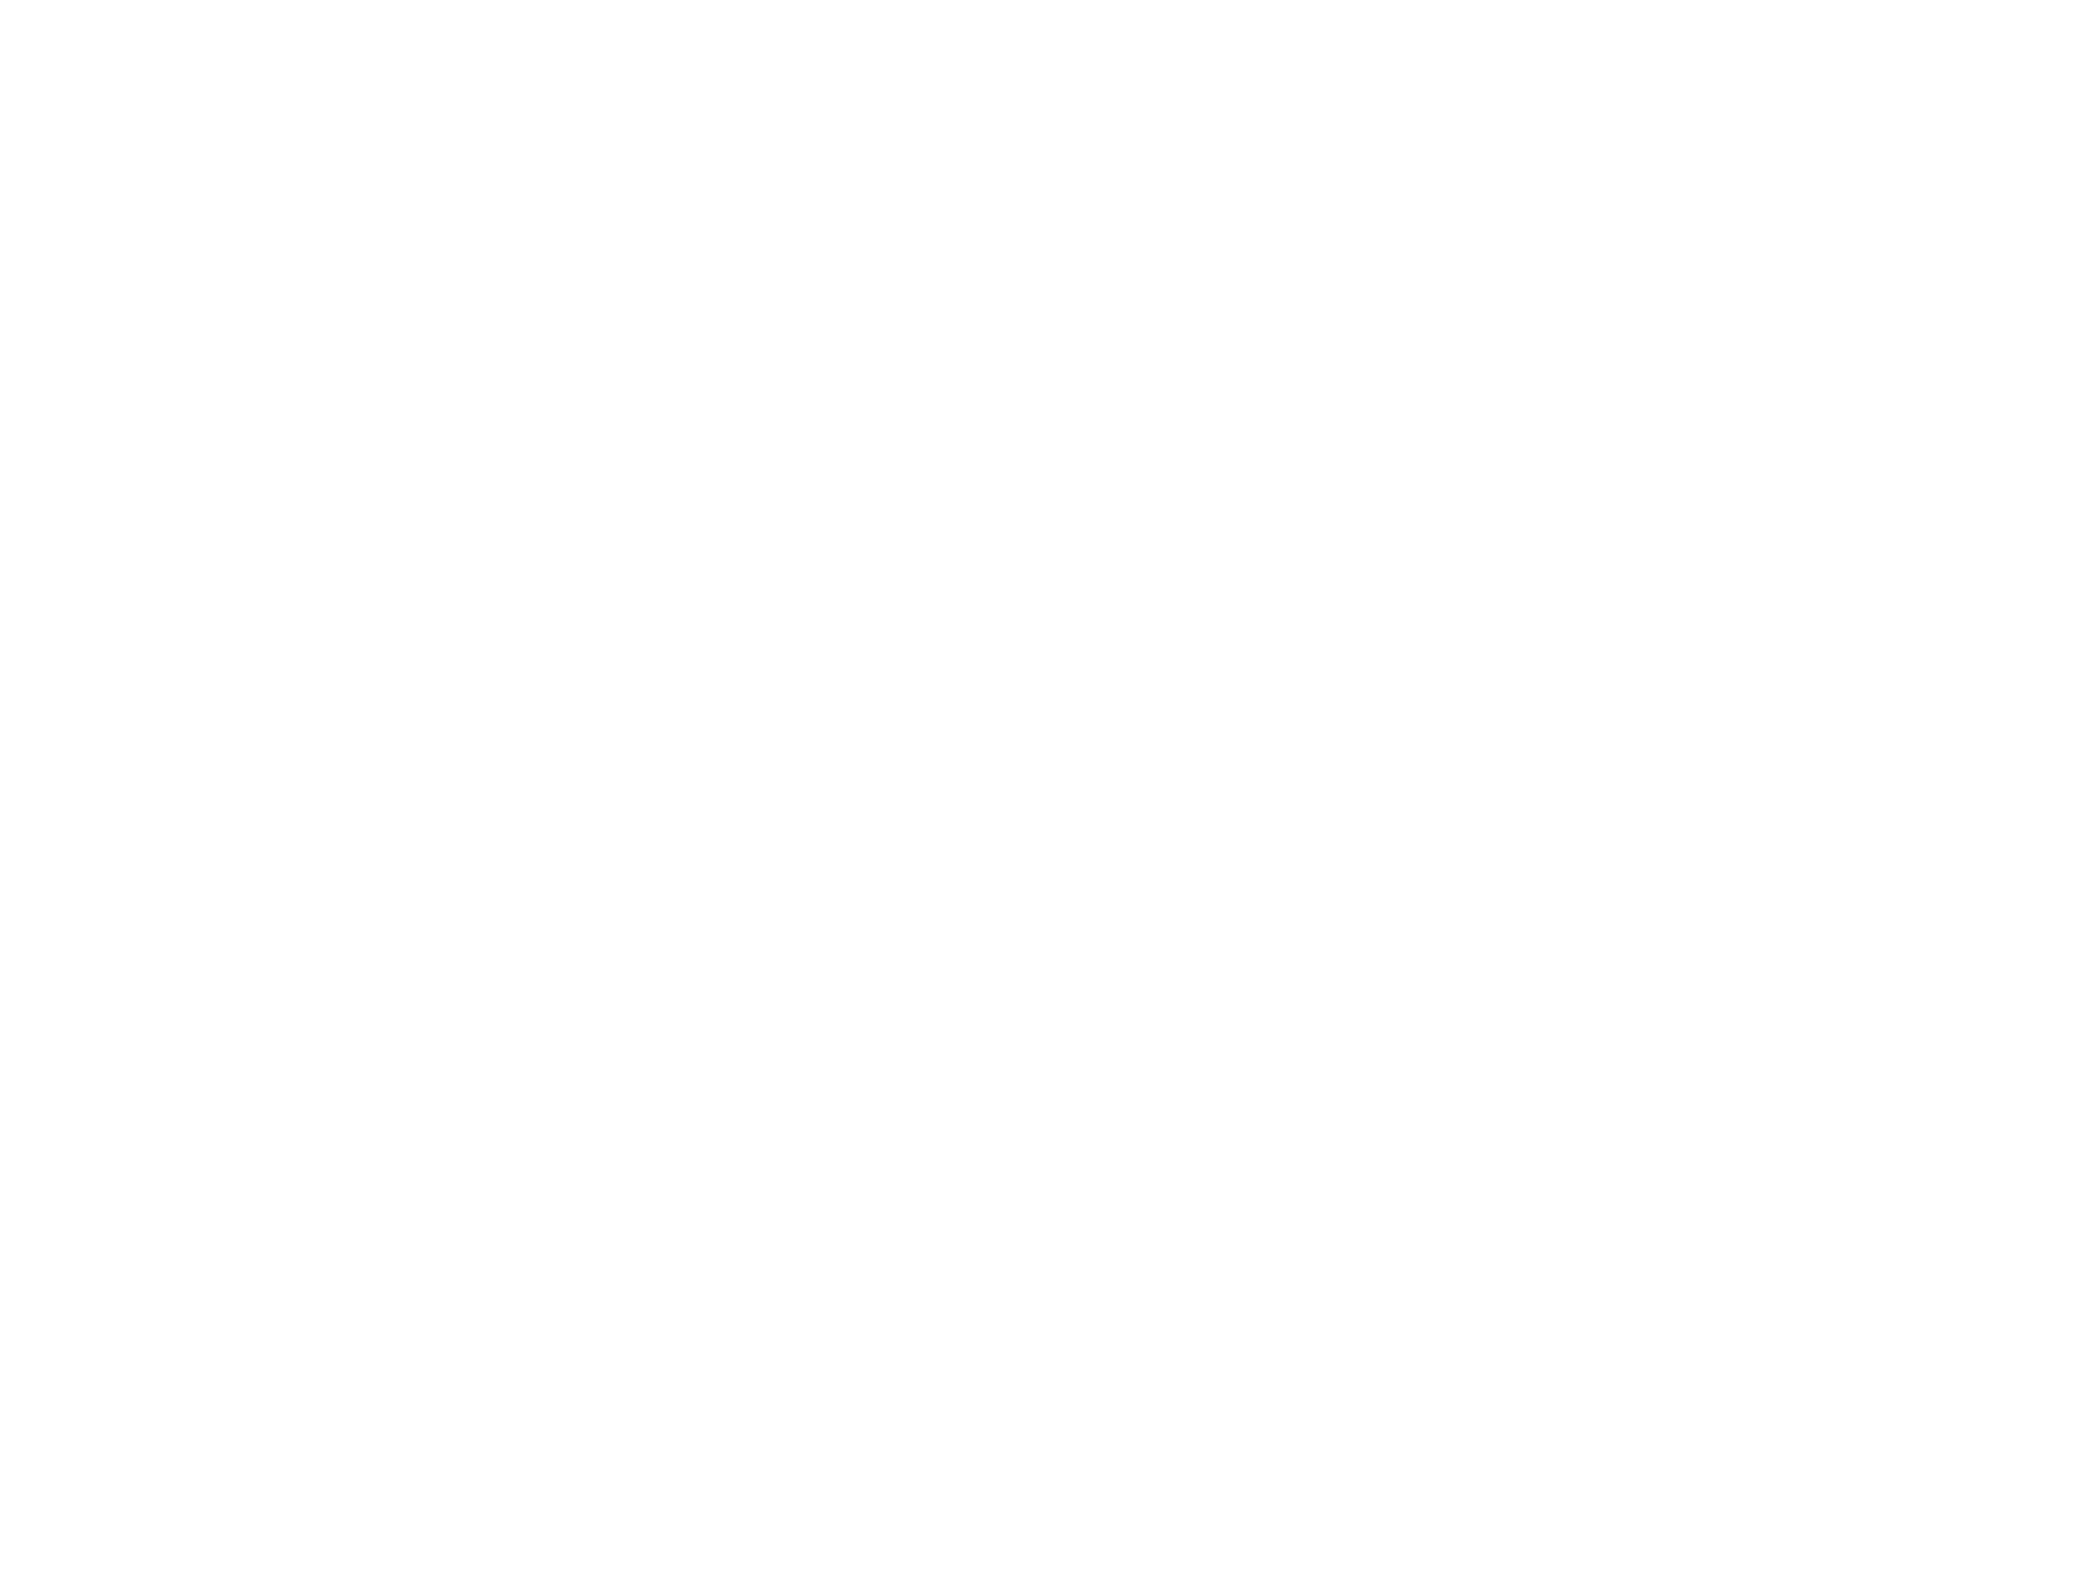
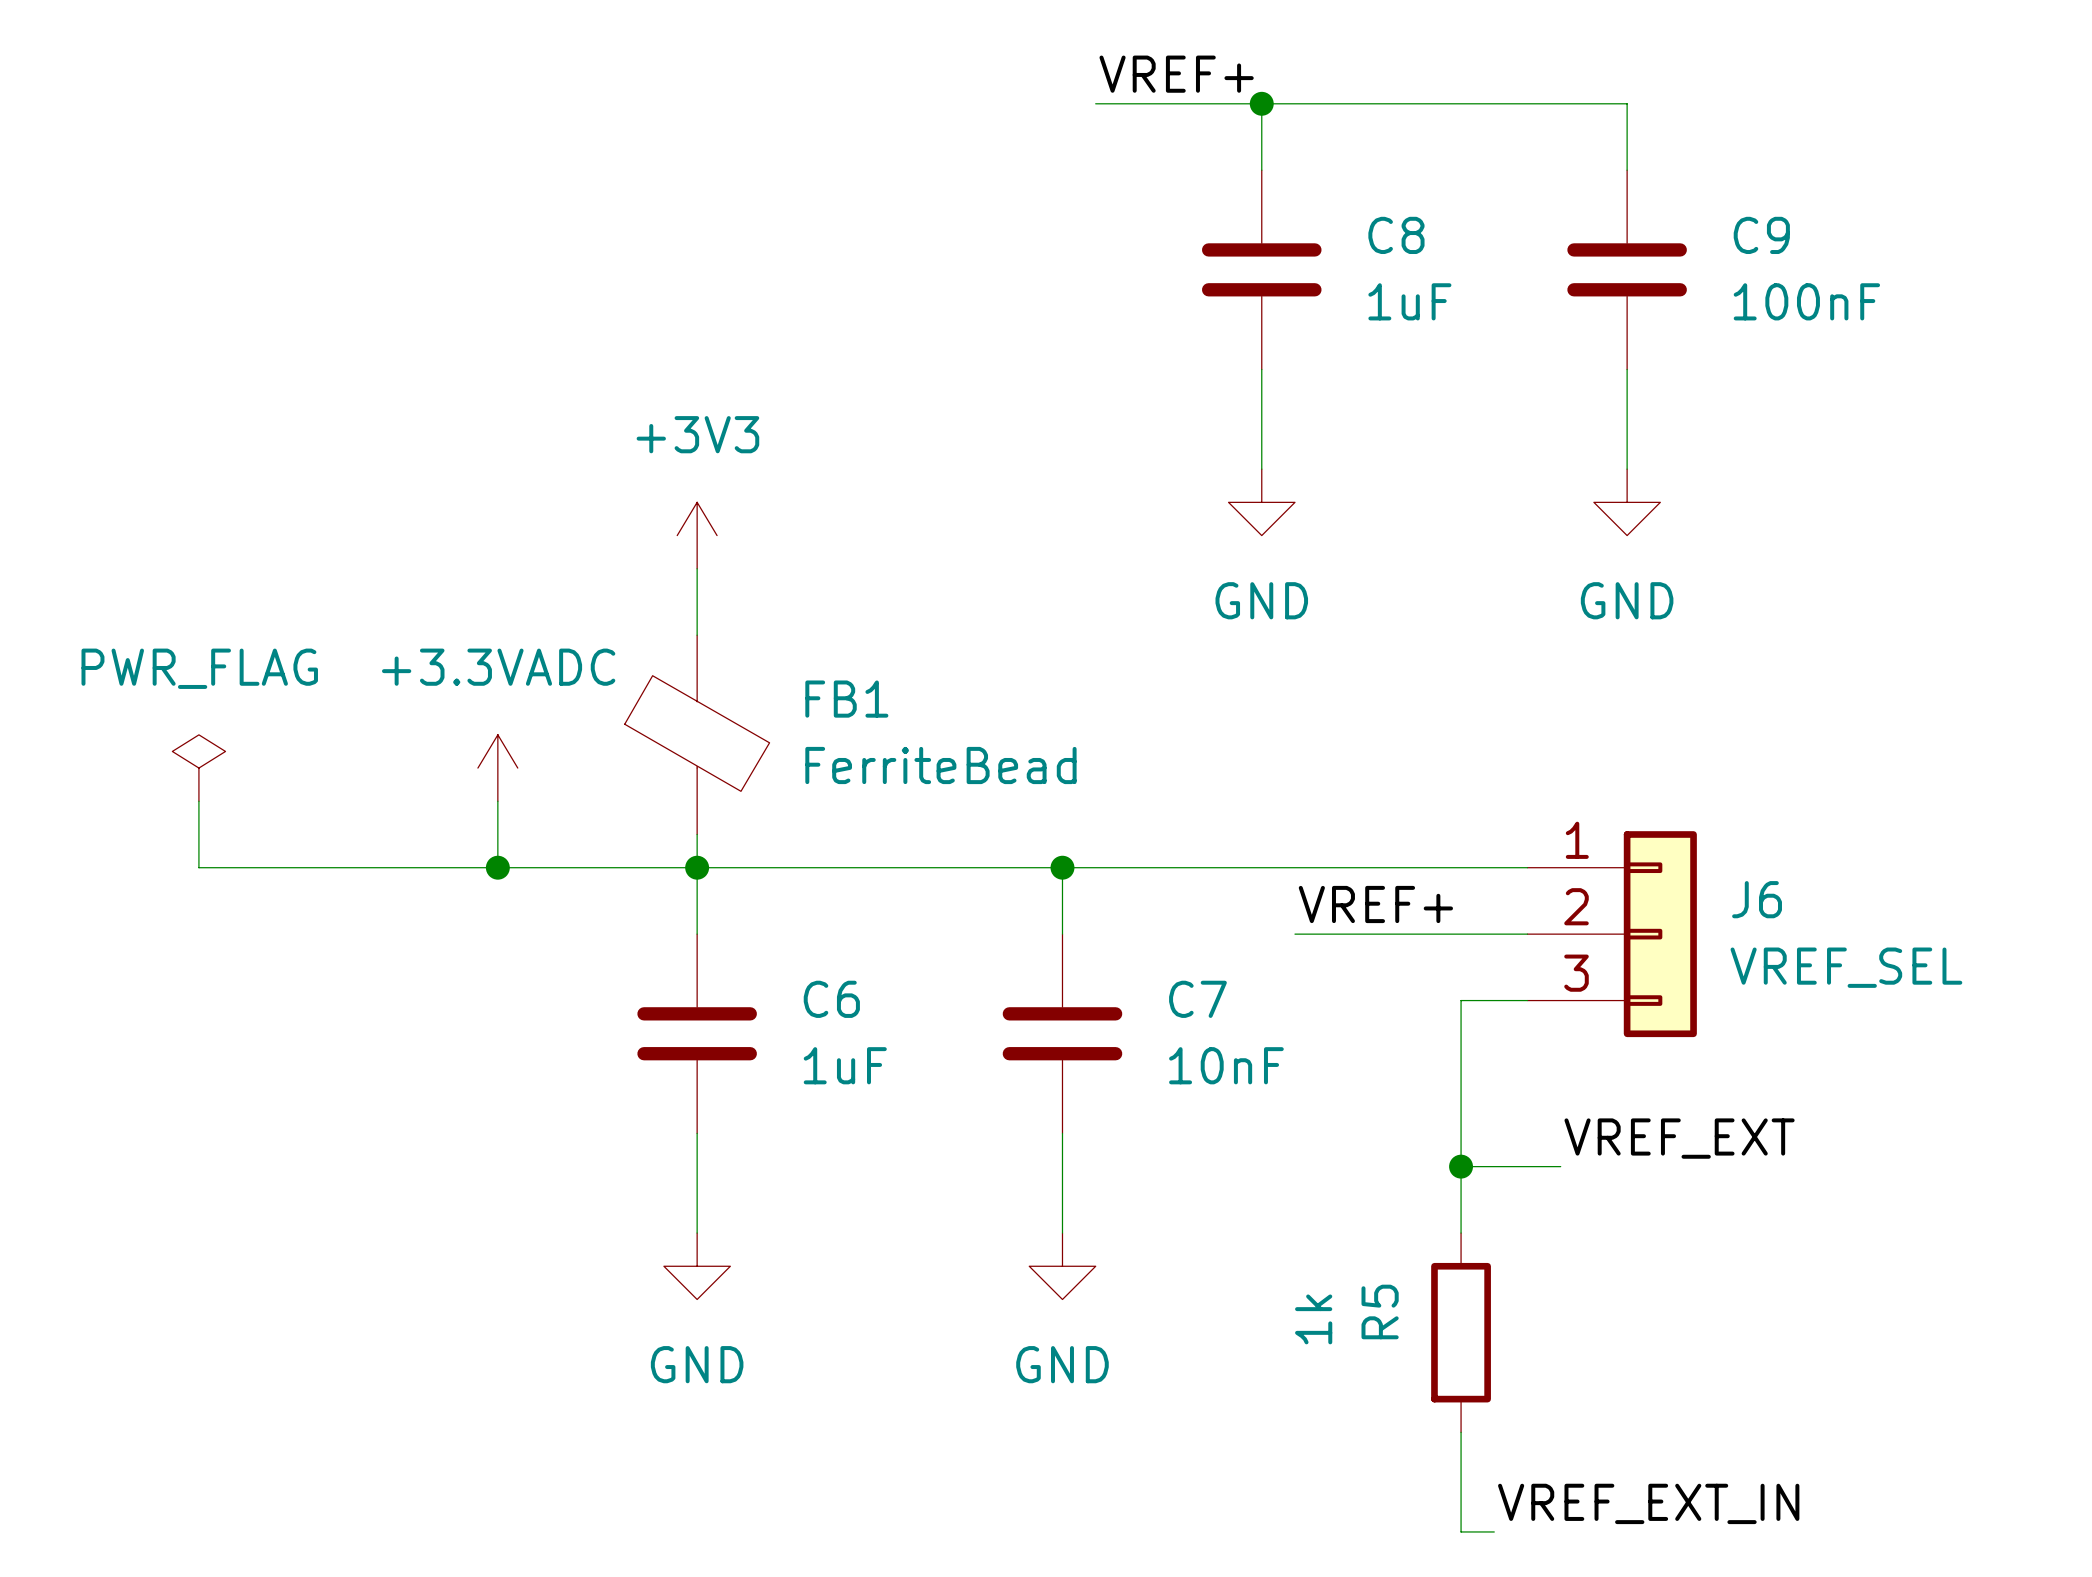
label: none -> VREF+ (1176, 74)
wire: none -> (1095, 103) (1627, 103) (1627, 170)
wire: none -> (1261, 103) (1261, 170)
junction: none -> (1261, 103)
C8: none -> 1uF (1261, 269)
C9: none -> 100nF (1627, 269)
wire: none -> (1261, 369) (1261, 469)
wire: none -> (1627, 369) (1627, 469)
power symbol: none -> GND (1261, 502)
power symbol: none -> GND (1627, 502)
power symbol: none -> +3V3 (697, 535)
wire: none -> (697, 568) (697, 635)
FB1: none -> FerriteBead (697, 734)
power symbol: none -> PWR_FLAG (198, 768)
power symbol: none -> +3.3VADC (497, 768)
wire: none -> (198, 801) (198, 867) (1527, 867)
wire: none -> (497, 801) (497, 867)
wire: none -> (697, 834) (697, 934)
junction: none -> (497, 867)
junction: none -> (697, 867)
wire: none -> (1062, 867) (1062, 934)
junction: none -> (1062, 867)
label: none -> VREF+ (1375, 904)
wire: none -> (1294, 934) (1527, 934)
J6: none -> VREF_SEL (1612, 934)
wire: none -> (1527, 1000) (1461, 1000) (1461, 1233)
C6: none -> 1uF (697, 1033)
C7: none -> 10nF (1062, 1033)
wire: none -> (697, 1133) (697, 1233)
wire: none -> (1062, 1133) (1062, 1233)
label: none -> VREF_EXT (1679, 1138)
wire: none -> (1461, 1166) (1560, 1166)
junction: none -> (1461, 1166)
power symbol: none -> GND (697, 1266)
power symbol: none -> GND (1062, 1266)
R5: none -> 1k (1461, 1332)
wire: none -> (1461, 1432) (1461, 1531) (1494, 1531)
label: none -> VREF_EXT_IN (1648, 1503)

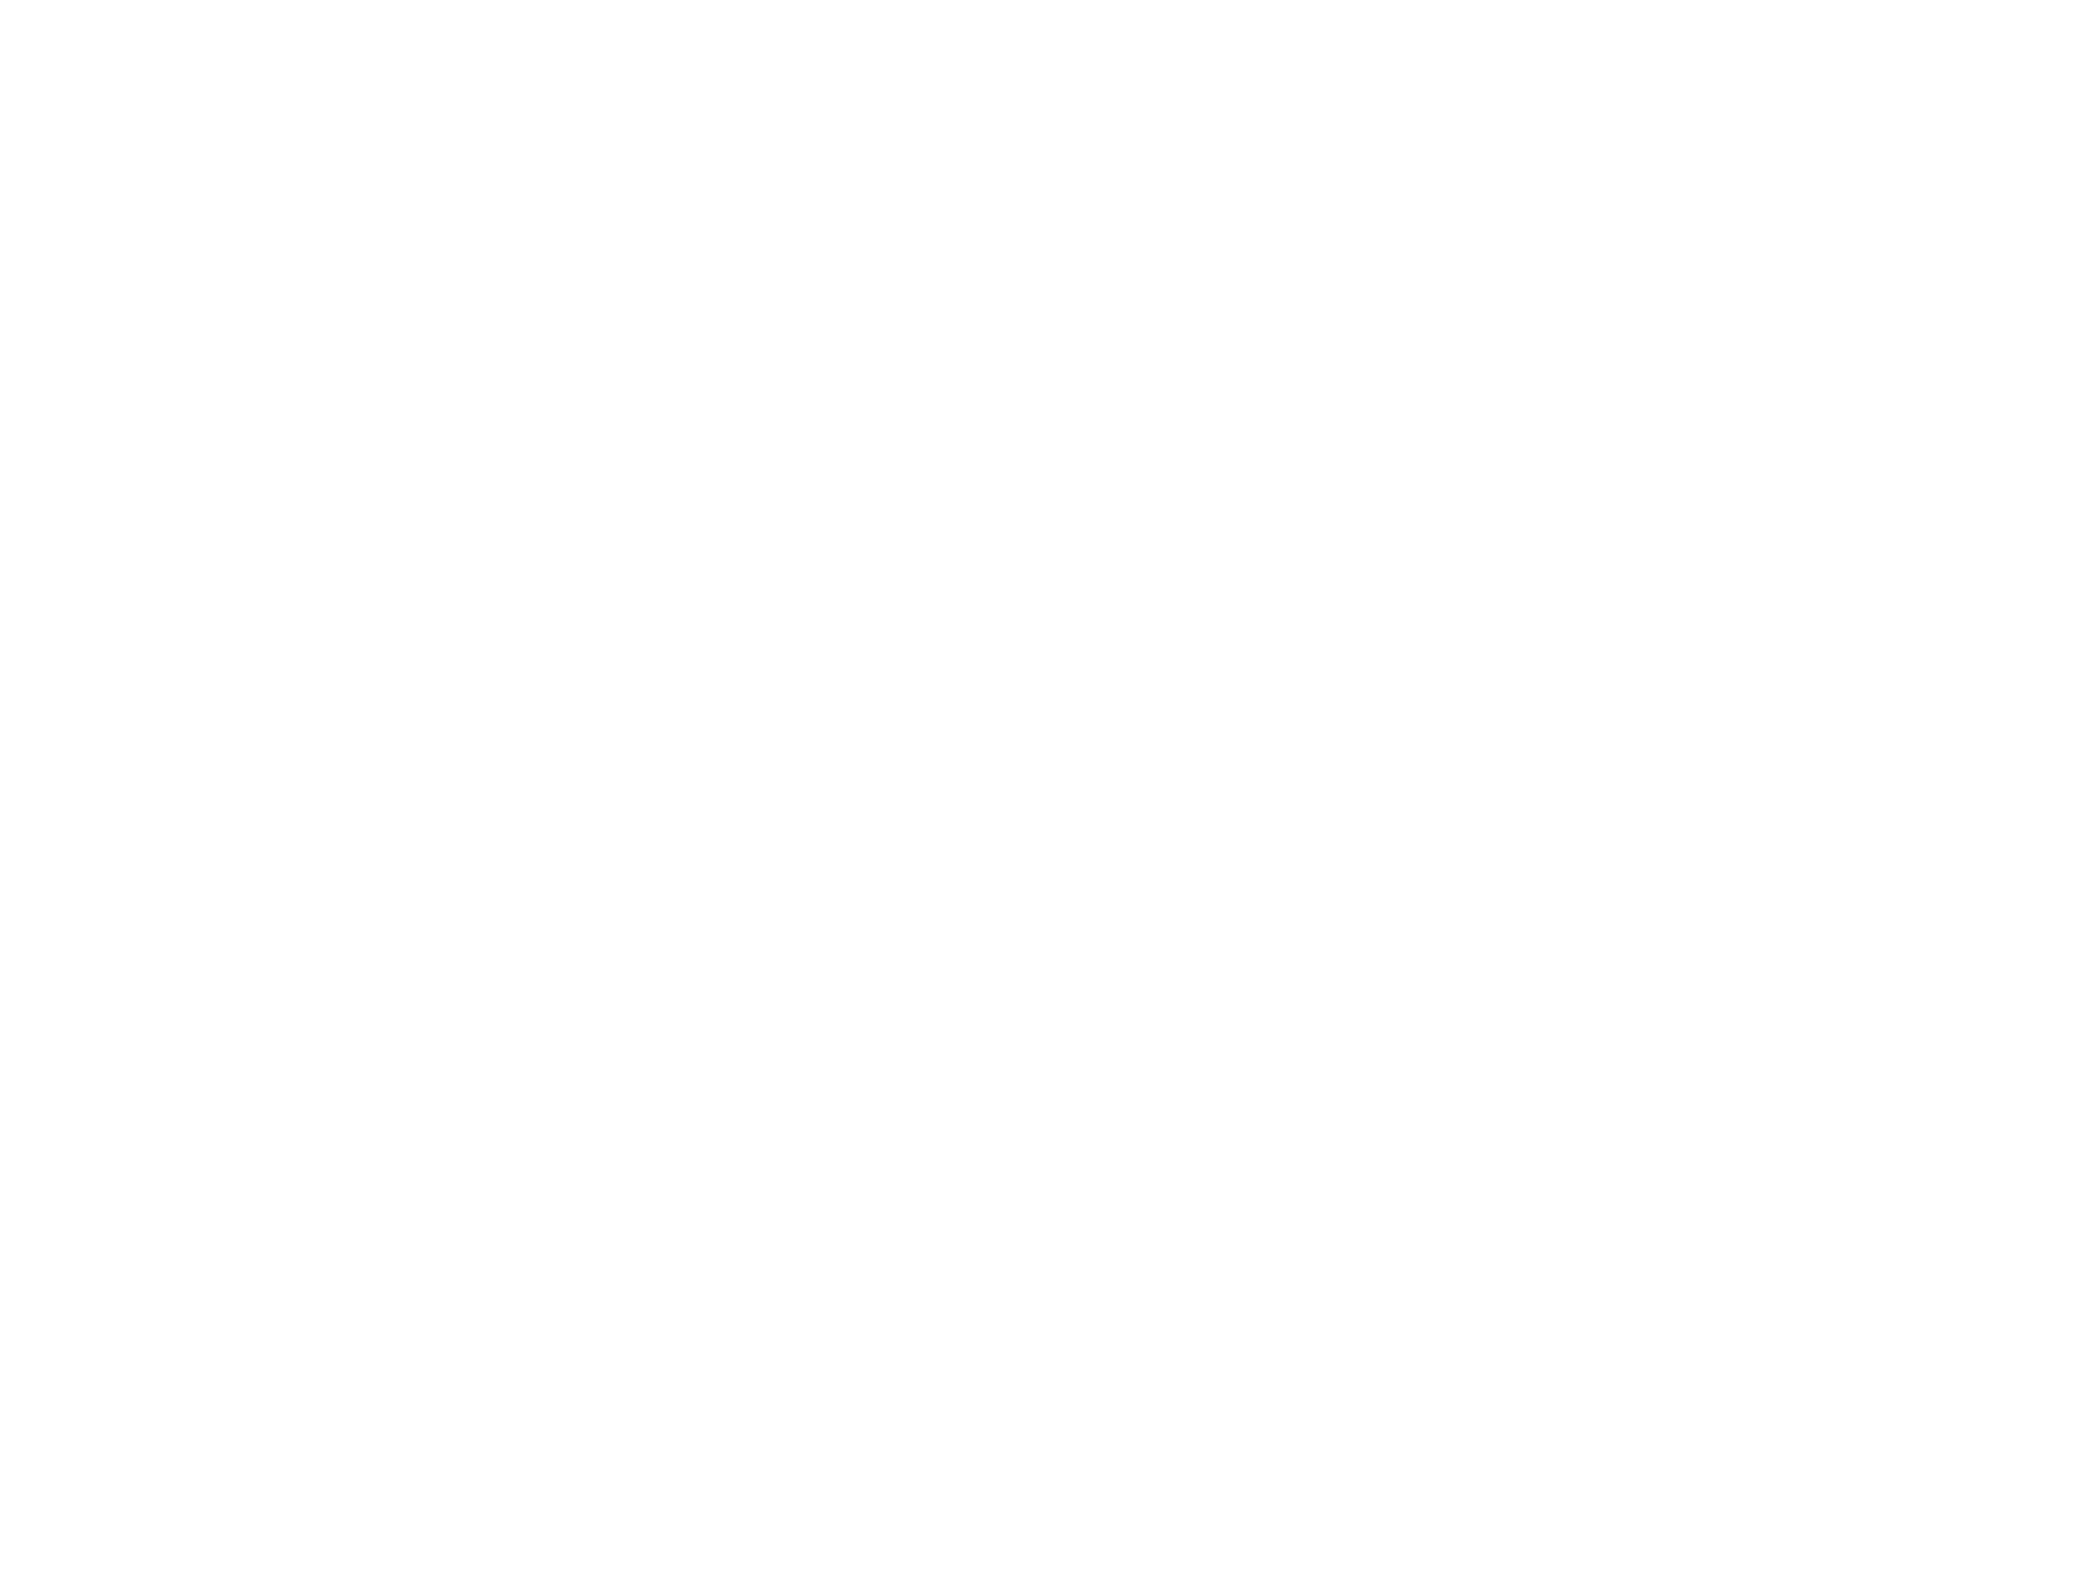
label: VREF+ (1176, 74) -> none
wire: (1095, 103) (1627, 103) (1627, 170) -> none
wire: (1261, 103) (1261, 170) -> none
junction: (1261, 103) -> none
C8: 1uF (1261, 269) -> none
C9: 100nF (1627, 269) -> none
wire: (1261, 369) (1261, 469) -> none
wire: (1627, 369) (1627, 469) -> none
power symbol: GND (1261, 502) -> none
power symbol: GND (1627, 502) -> none
power symbol: +3V3 (697, 535) -> none
wire: (697, 568) (697, 635) -> none
FB1: FerriteBead (697, 734) -> none
power symbol: PWR_FLAG (198, 768) -> none
power symbol: +3.3VADC (497, 768) -> none
wire: (198, 801) (198, 867) (1527, 867) -> none
wire: (497, 801) (497, 867) -> none
wire: (697, 834) (697, 934) -> none
junction: (497, 867) -> none
junction: (697, 867) -> none
wire: (1062, 867) (1062, 934) -> none
junction: (1062, 867) -> none
label: VREF+ (1375, 904) -> none
wire: (1294, 934) (1527, 934) -> none
J6: VREF_SEL (1612, 934) -> none
wire: (1527, 1000) (1461, 1000) (1461, 1233) -> none
C6: 1uF (697, 1033) -> none
C7: 10nF (1062, 1033) -> none
wire: (697, 1133) (697, 1233) -> none
wire: (1062, 1133) (1062, 1233) -> none
label: VREF_EXT (1679, 1138) -> none
wire: (1461, 1166) (1560, 1166) -> none
junction: (1461, 1166) -> none
power symbol: GND (697, 1266) -> none
power symbol: GND (1062, 1266) -> none
R5: 1k (1461, 1332) -> none
wire: (1461, 1432) (1461, 1531) (1494, 1531) -> none
label: VREF_EXT_IN (1648, 1503) -> none

